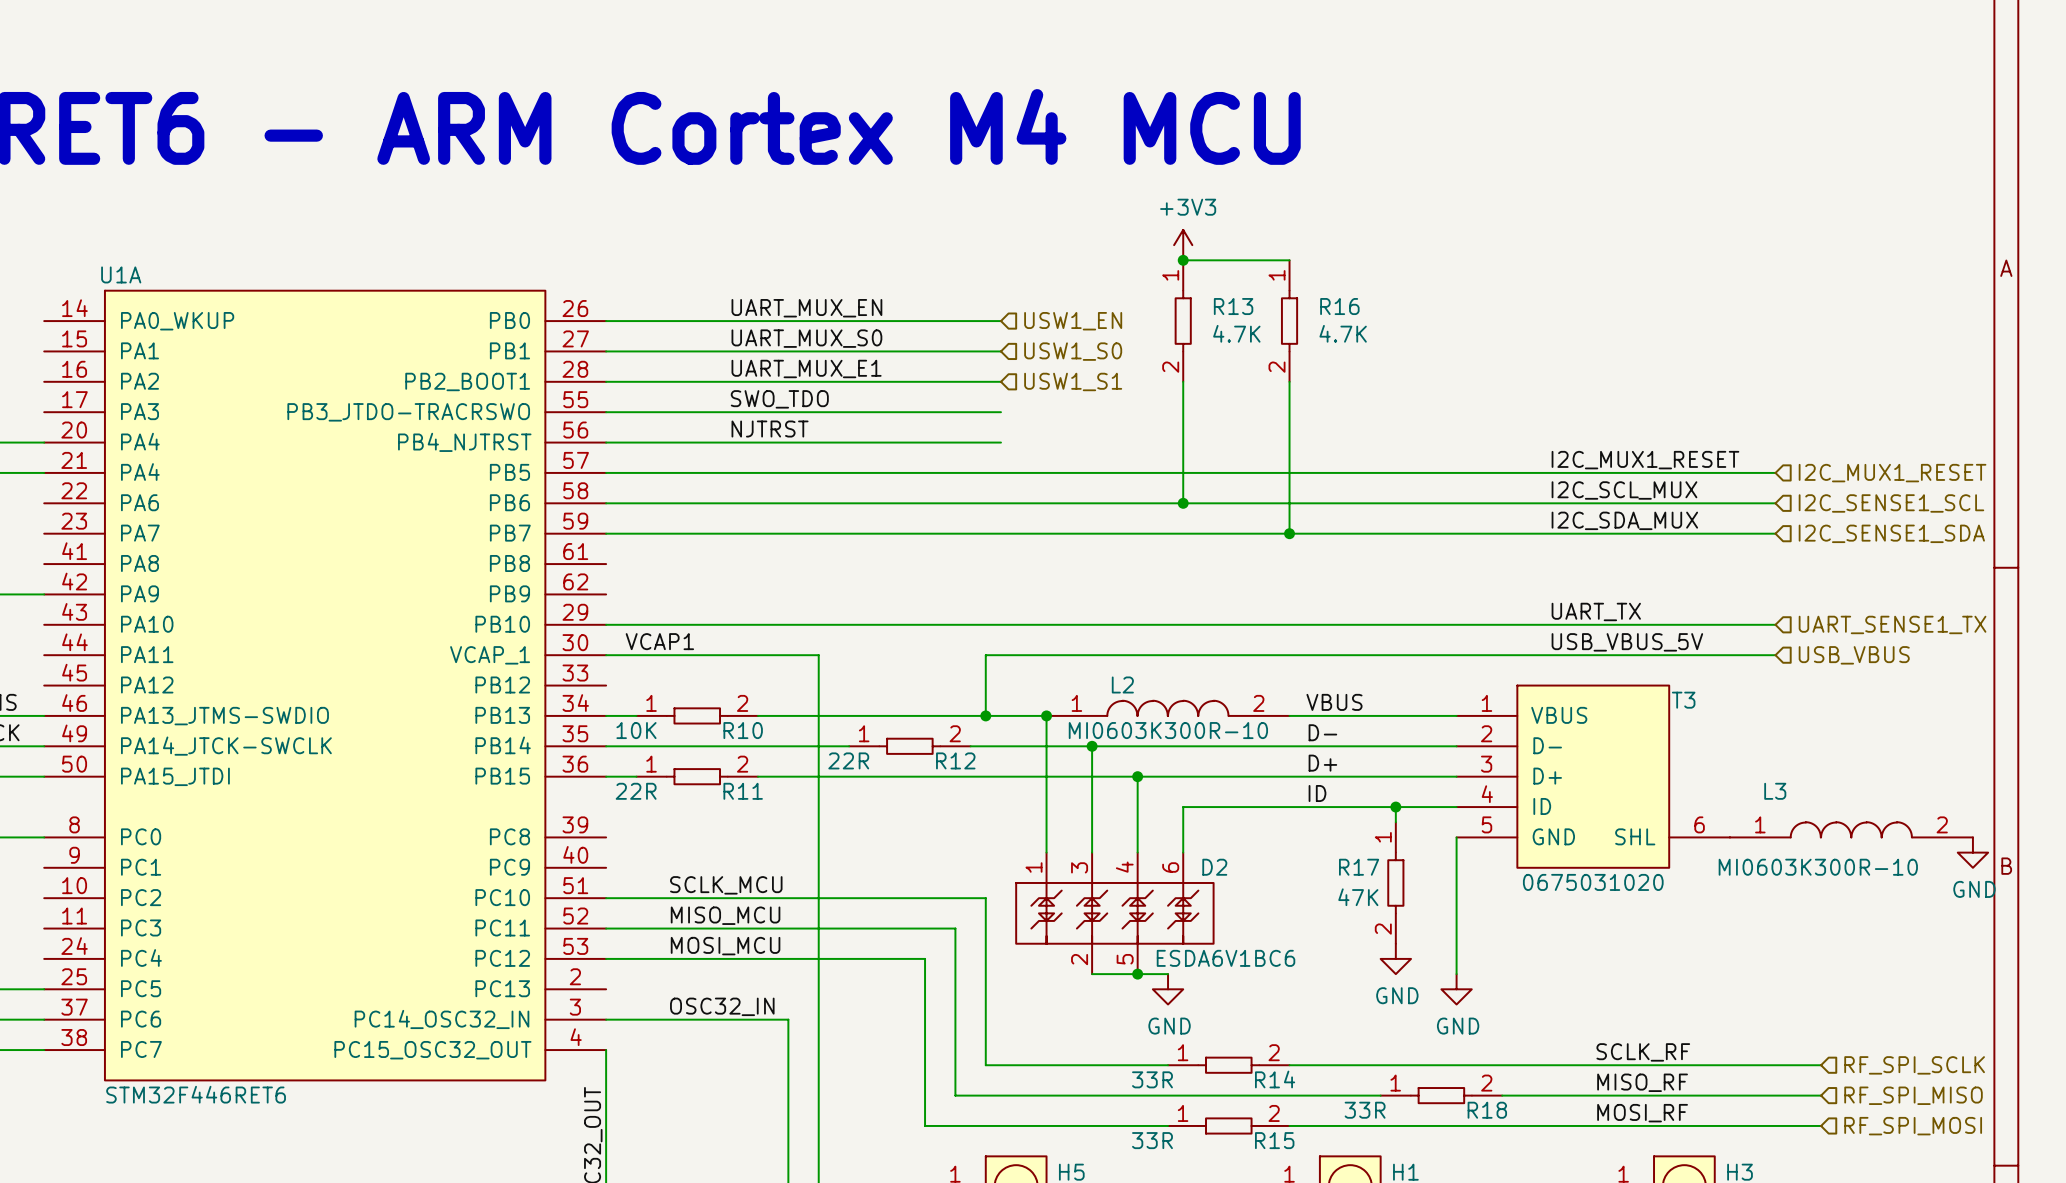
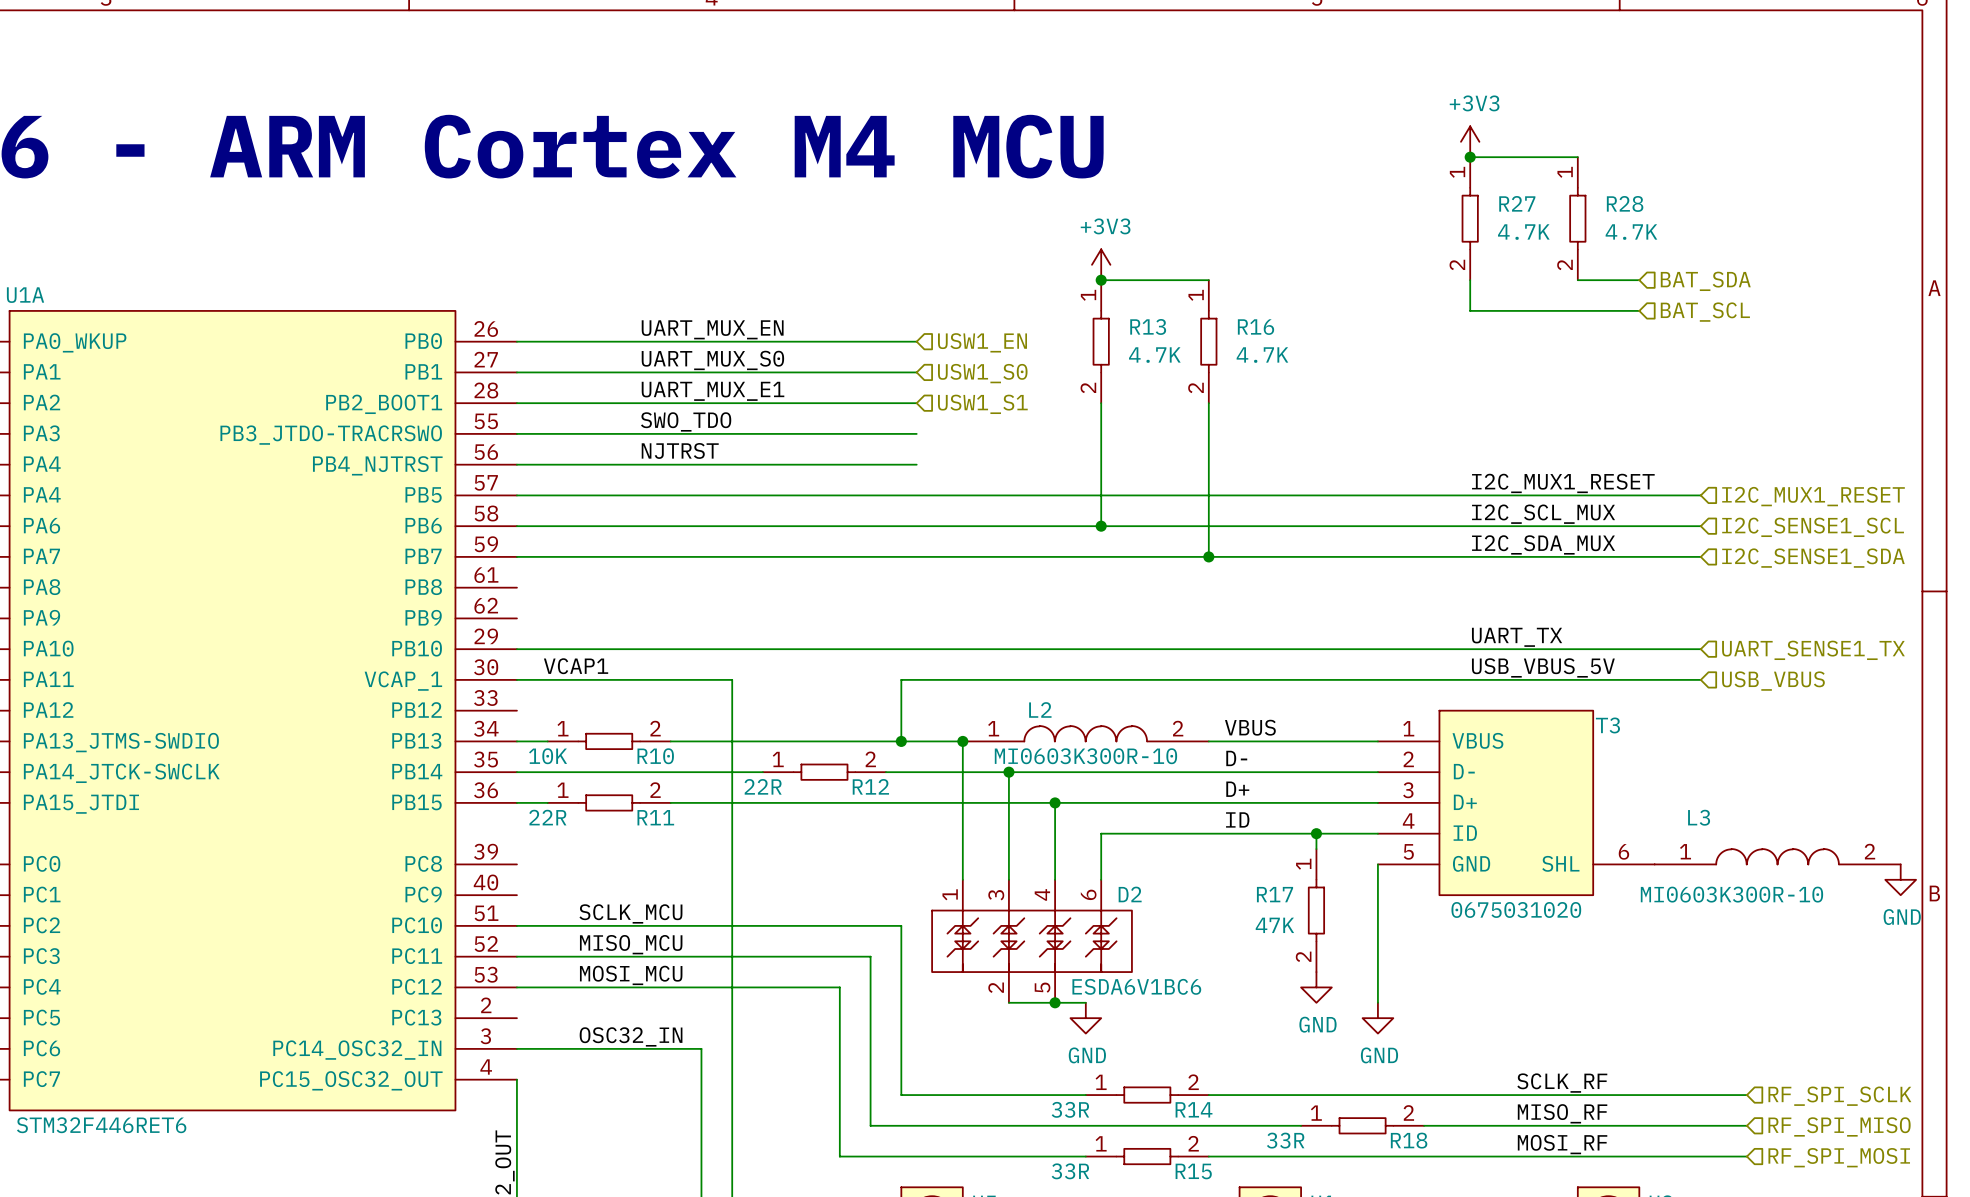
power symbol: none -> +3V3 (1470, 141)
wire: none -> (1470, 157) (1577, 157)
junction: none -> (1470, 157)
R27: none -> (1470, 218)
R28: none -> (1577, 218)
wire: none -> (1470, 280) (1470, 310) (1639, 310)
wire: none -> (1577, 280) (1639, 280)
hierarchical label: none -> BAT_SDA (1705, 281)
hierarchical label: none -> BAT_SCL (1705, 312)

